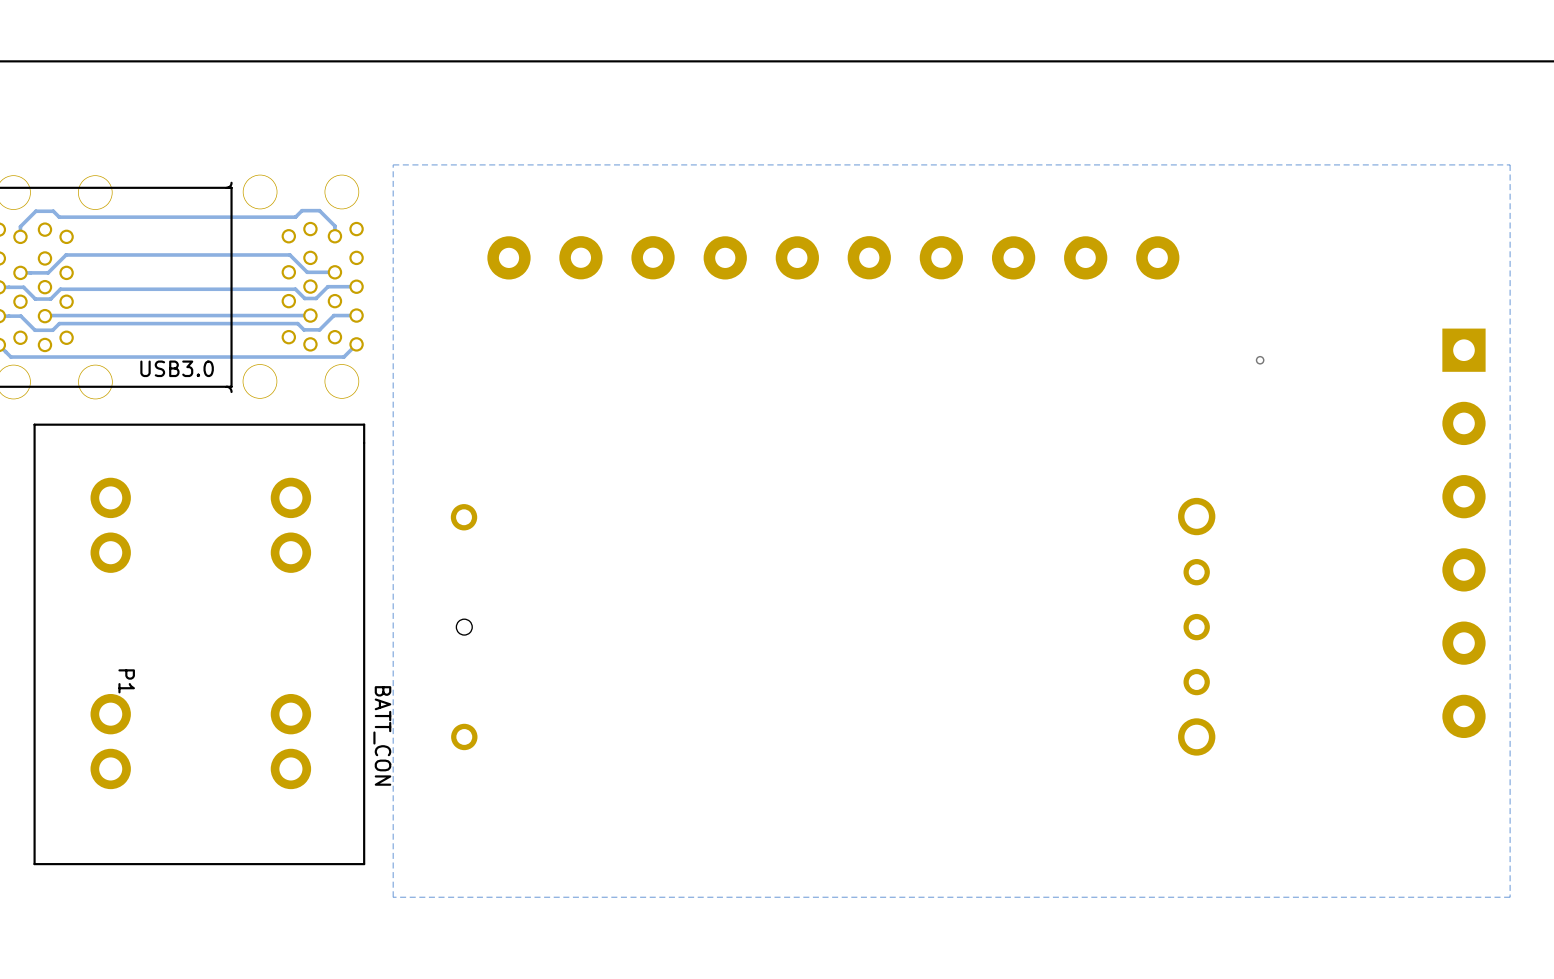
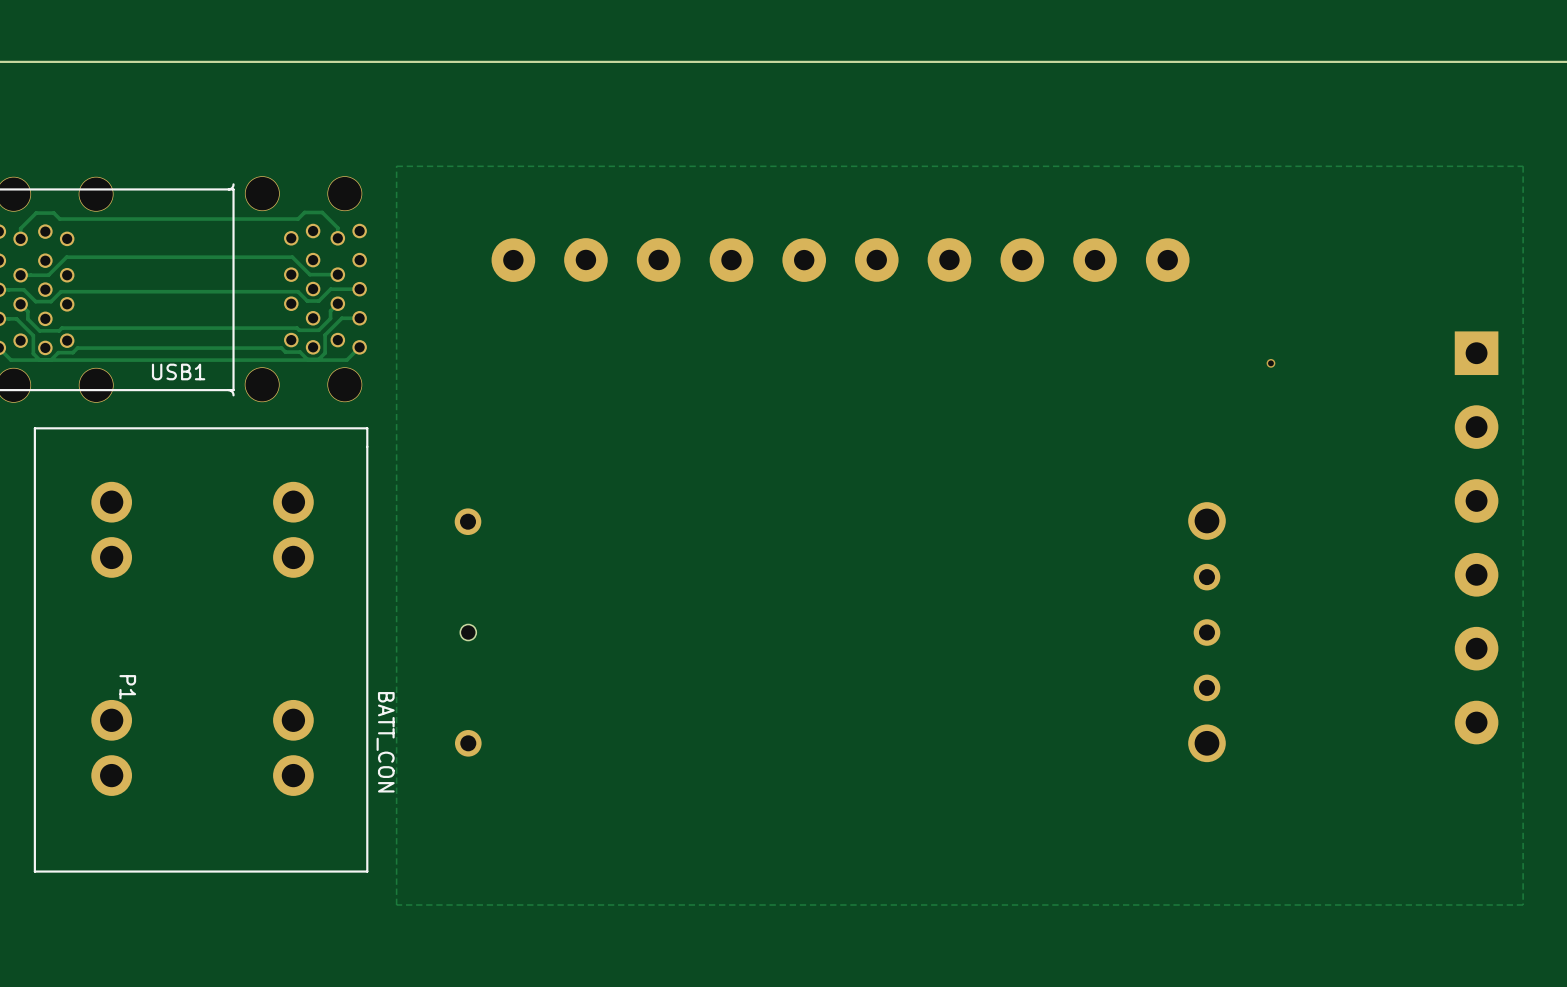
track: none -> (337, 303) (330, 311) (330, 318) (318, 330) (299, 330) (297, 328) (62, 328) (59, 330) (39, 330) (27, 319) (27, 311) (20, 304)
track: (310, 315) (45, 315) -> none
track: (338, 315) (333, 315) (319, 329) (304, 329) (297, 323) (59, 323) (52, 330) (35, 330) (20, 316) (16, 316) -> (341, 318) (325, 335) (325, 353) (318, 359) (307, 359) (300, 352) (285, 352) (281, 348) (77, 348) (72, 352) (58, 352) (51, 359) (39, 359) (33, 353) (33, 335) (16, 318)
USB3.0 name: USB3.0 (177, 368) -> USB1 (178, 371)

